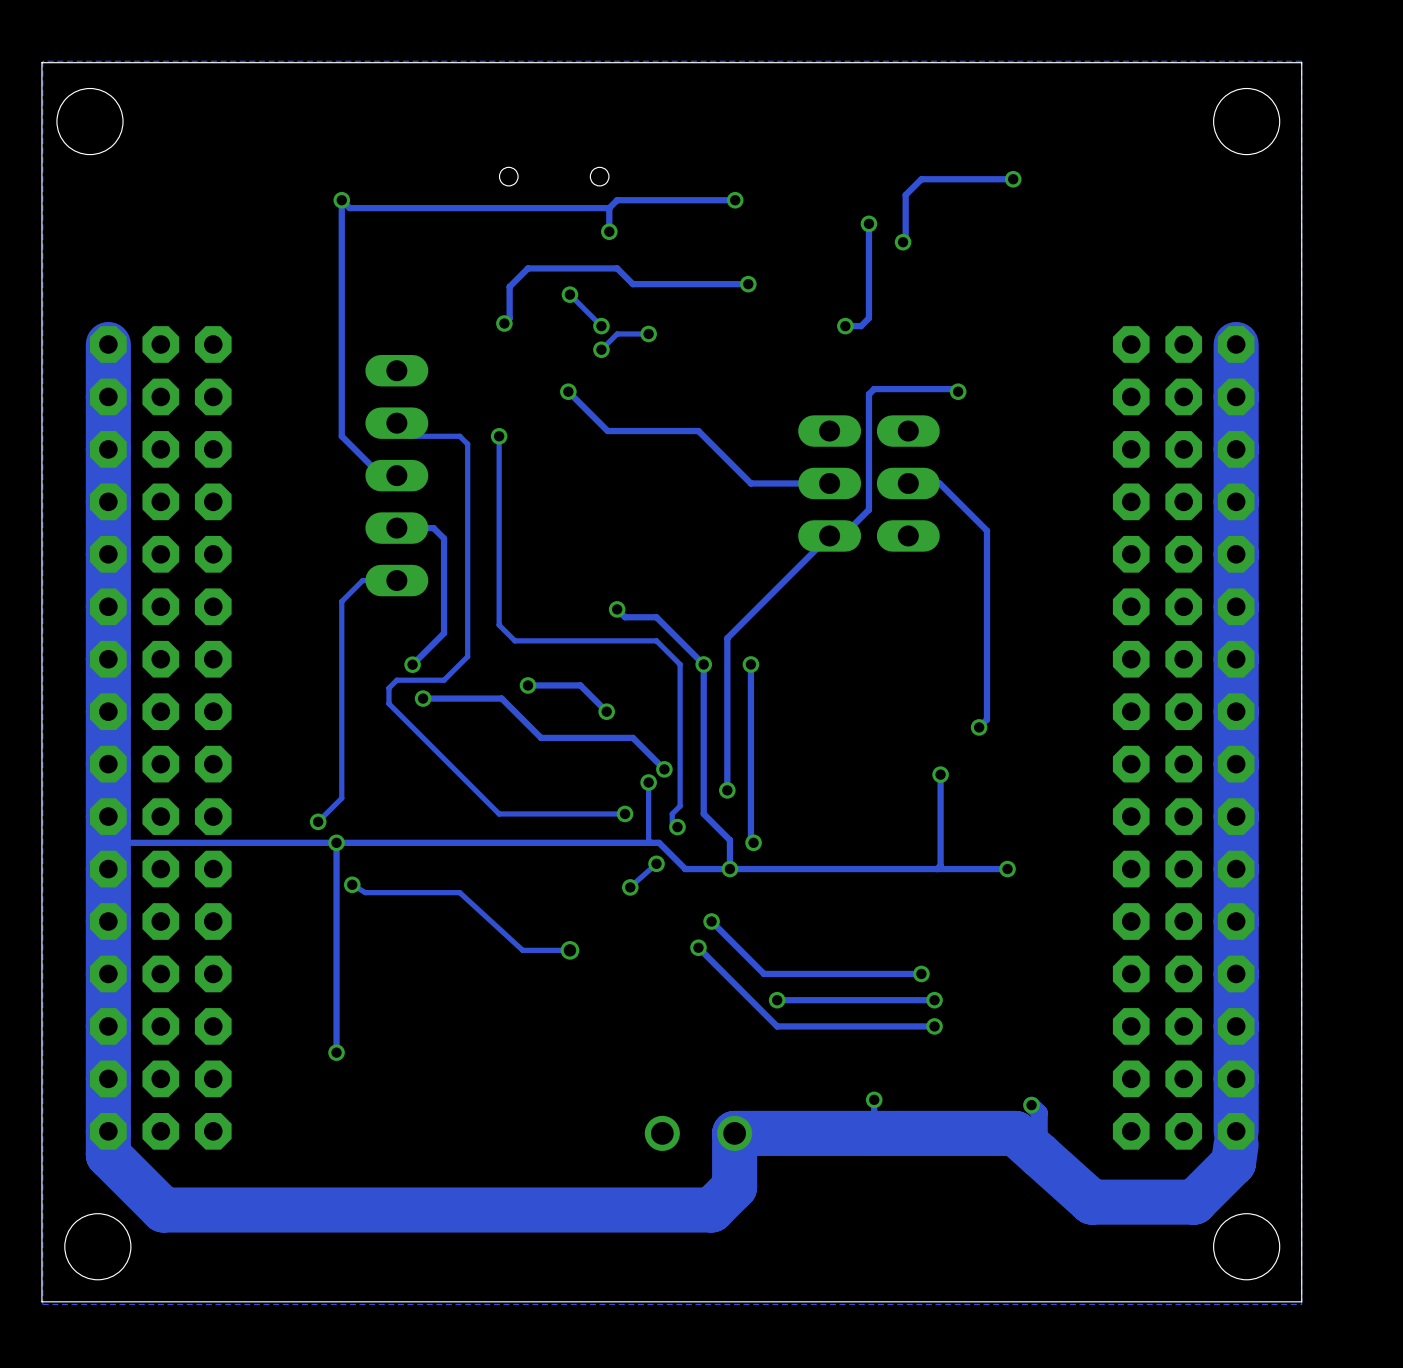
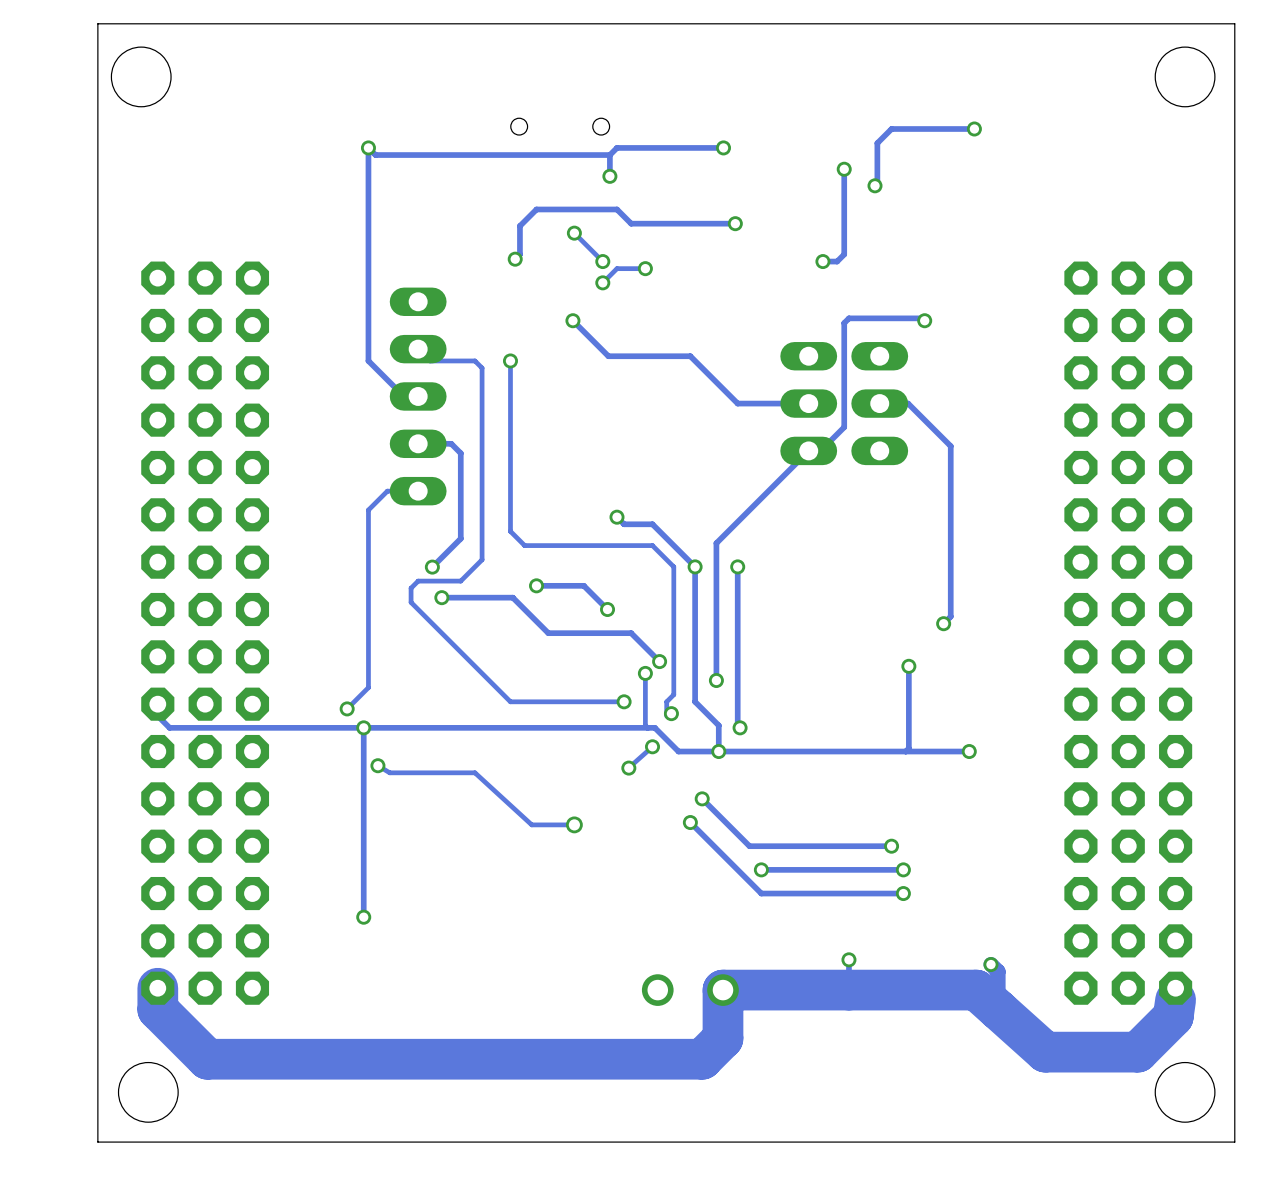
zone outline: (1301, 61) (42, 61) (42, 1304) (1301, 1304) (1301, 61) -> none
track: (108, 344) (108, 1131) -> none
track: (1236, 344) (1236, 1131) -> none

